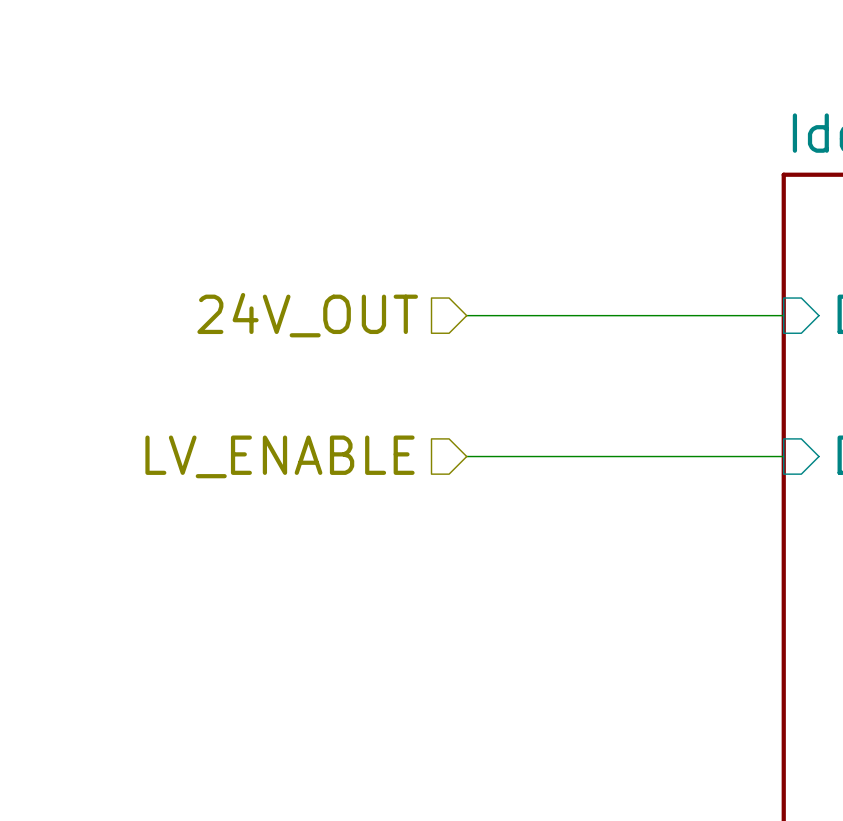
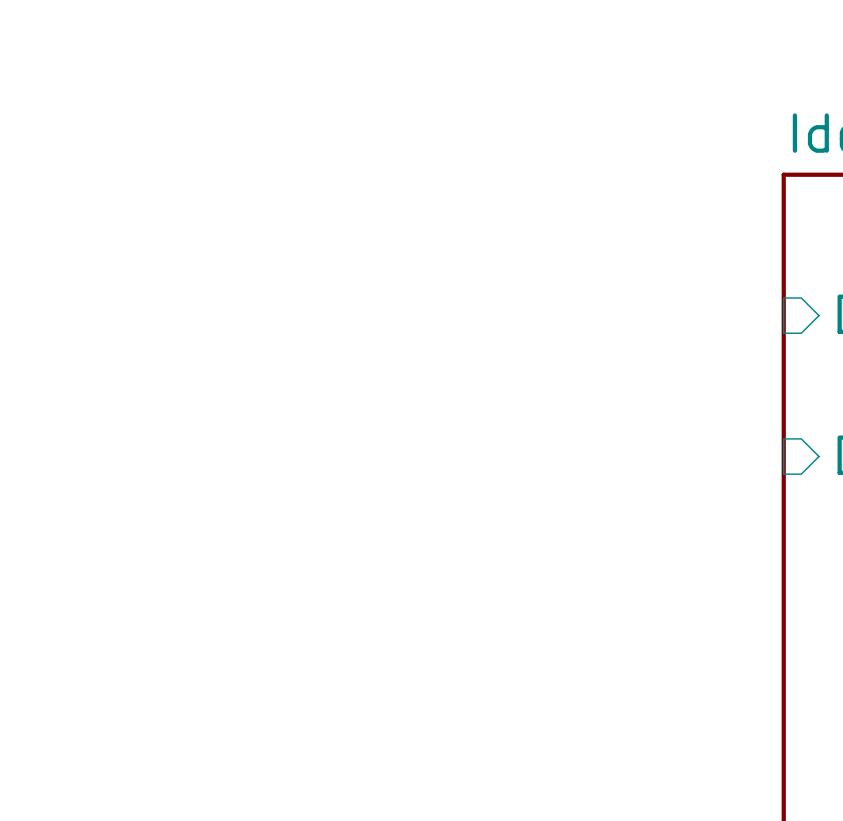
hierarchical label: 24V_OUT (307, 315) -> none
wire: (466, 315) (783, 315) -> none
hierarchical label: LV_ENABLE (280, 456) -> none
wire: (466, 456) (783, 456) -> none

